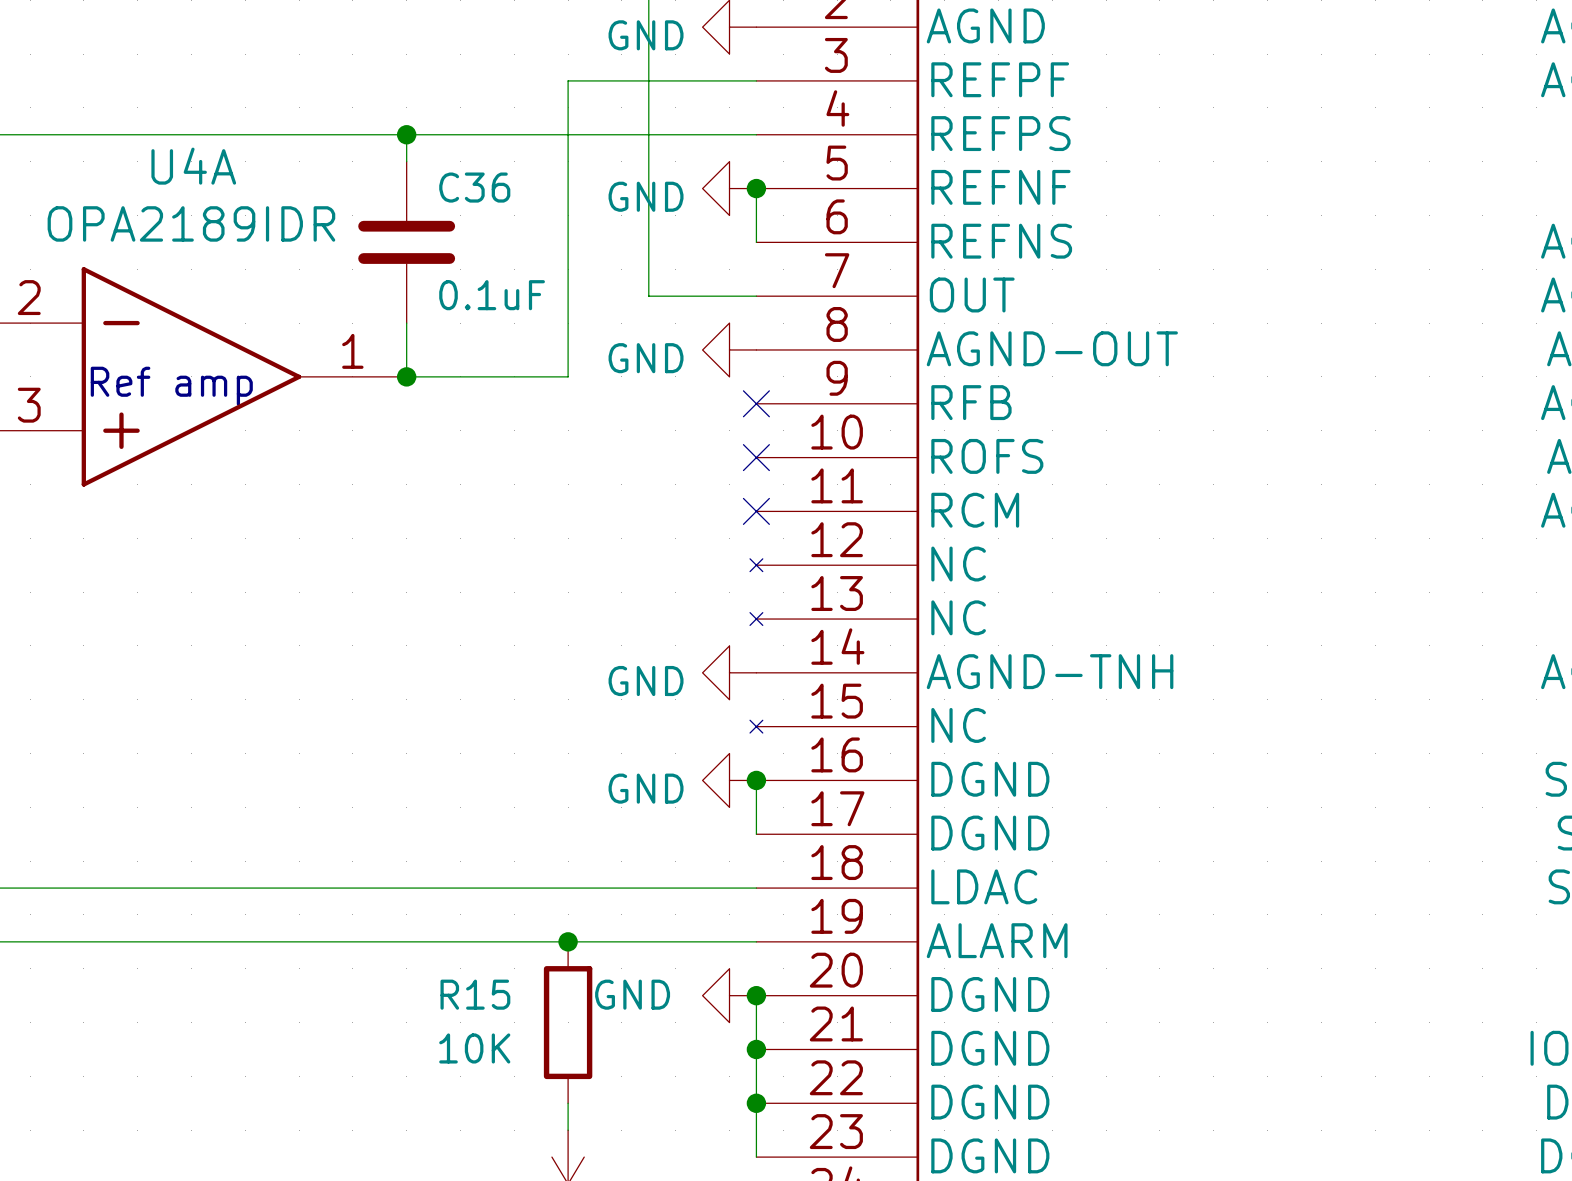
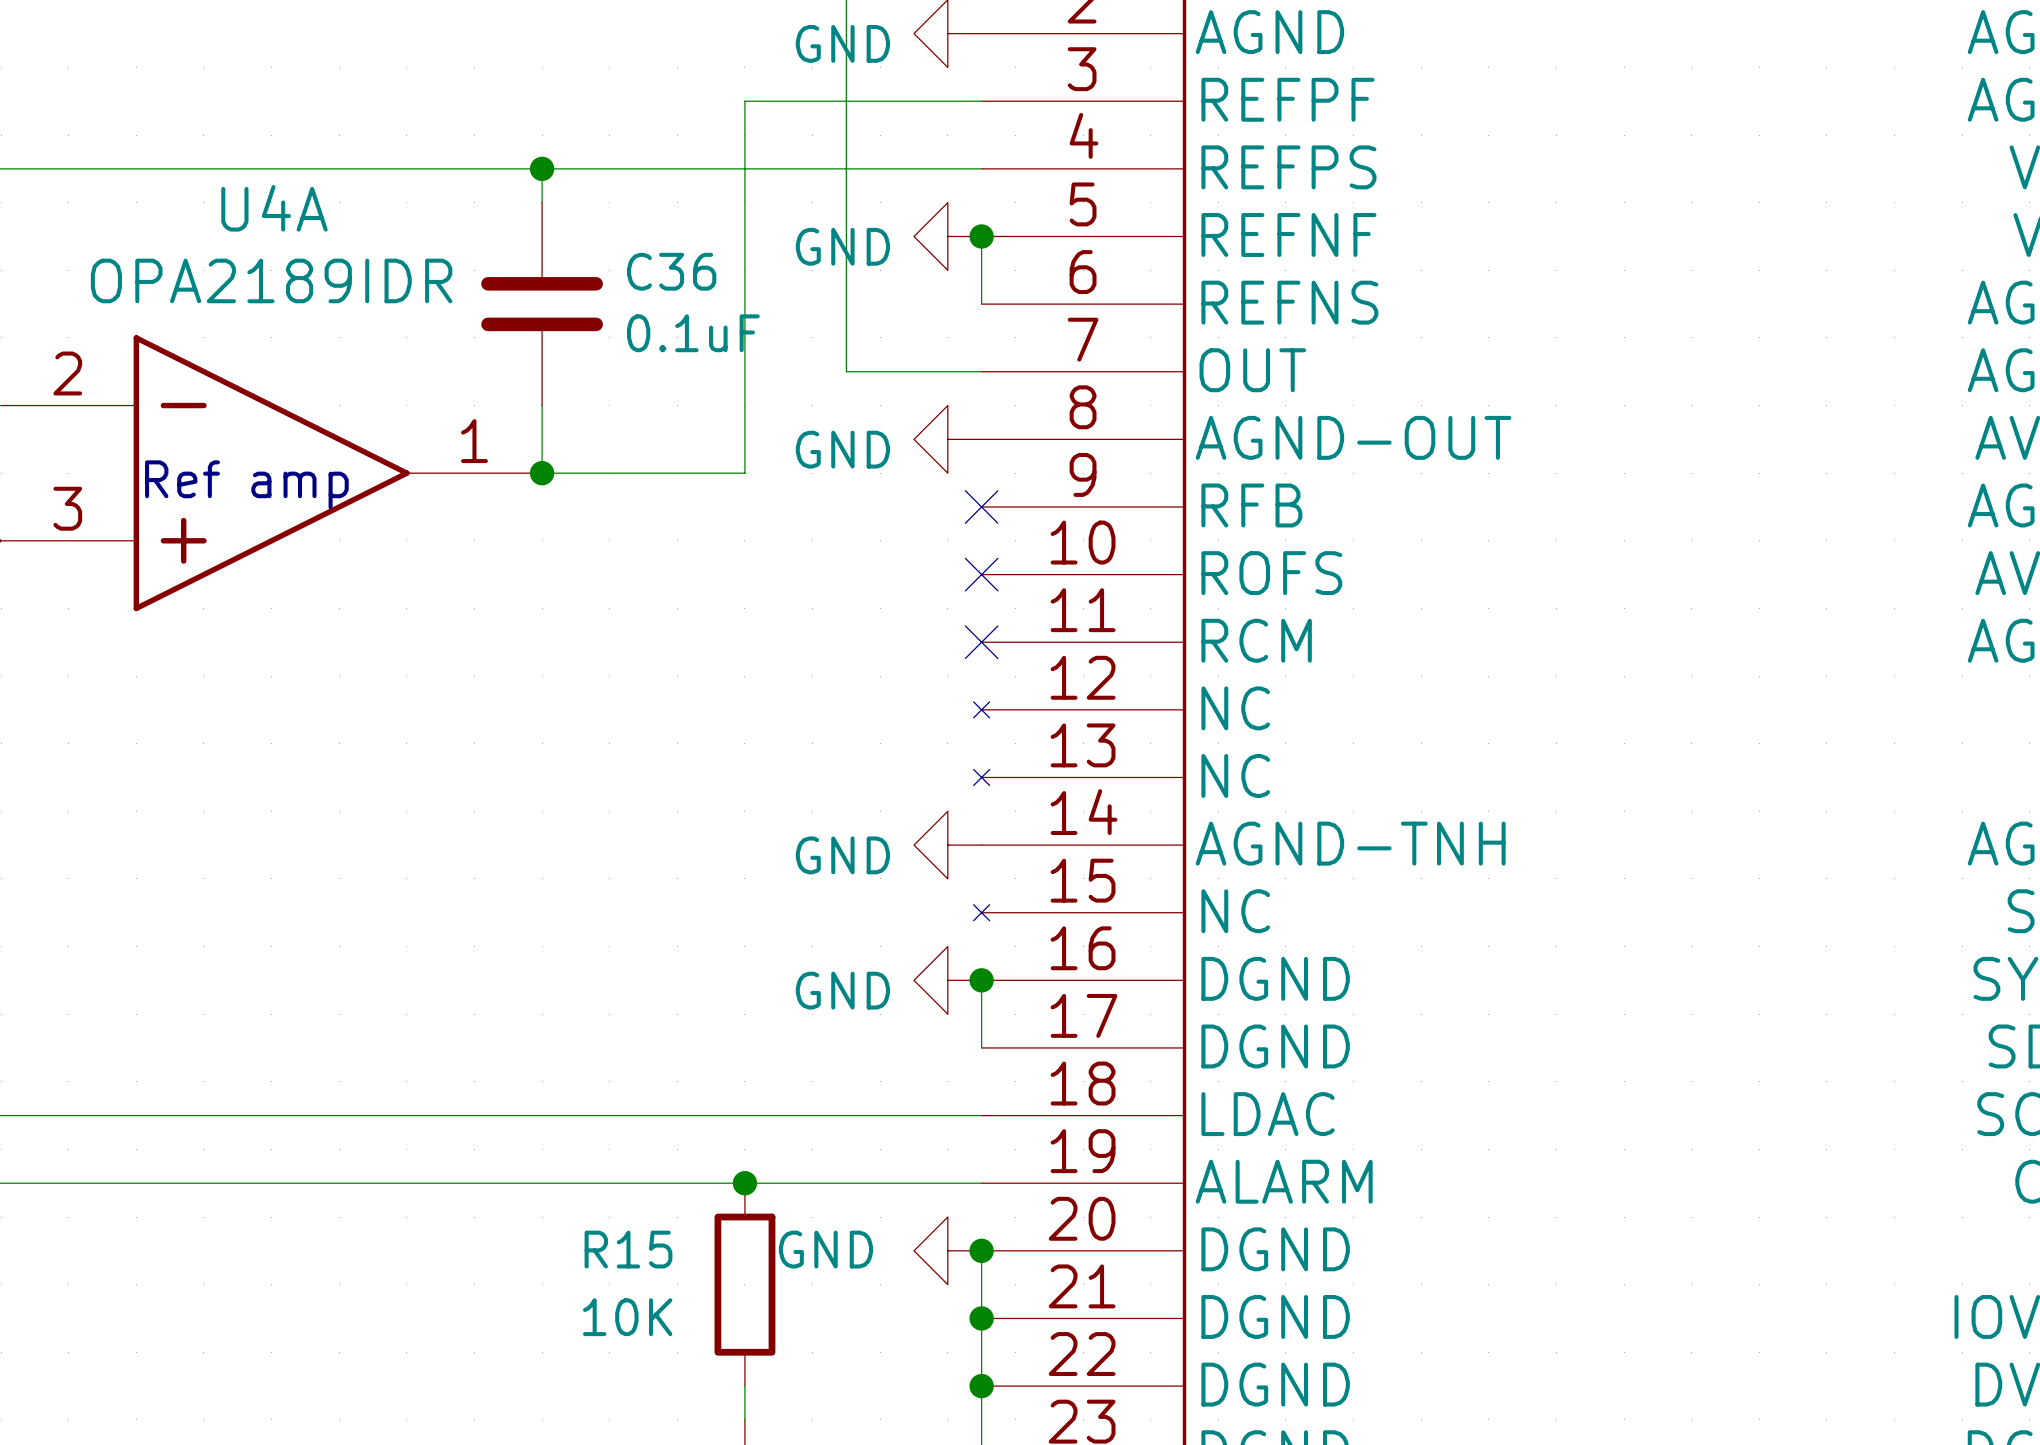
C36 name position: C36 (474, 187) -> C36 (671, 271)
C36 value position: 0.1uF (492, 295) -> 0.1uF (693, 333)

